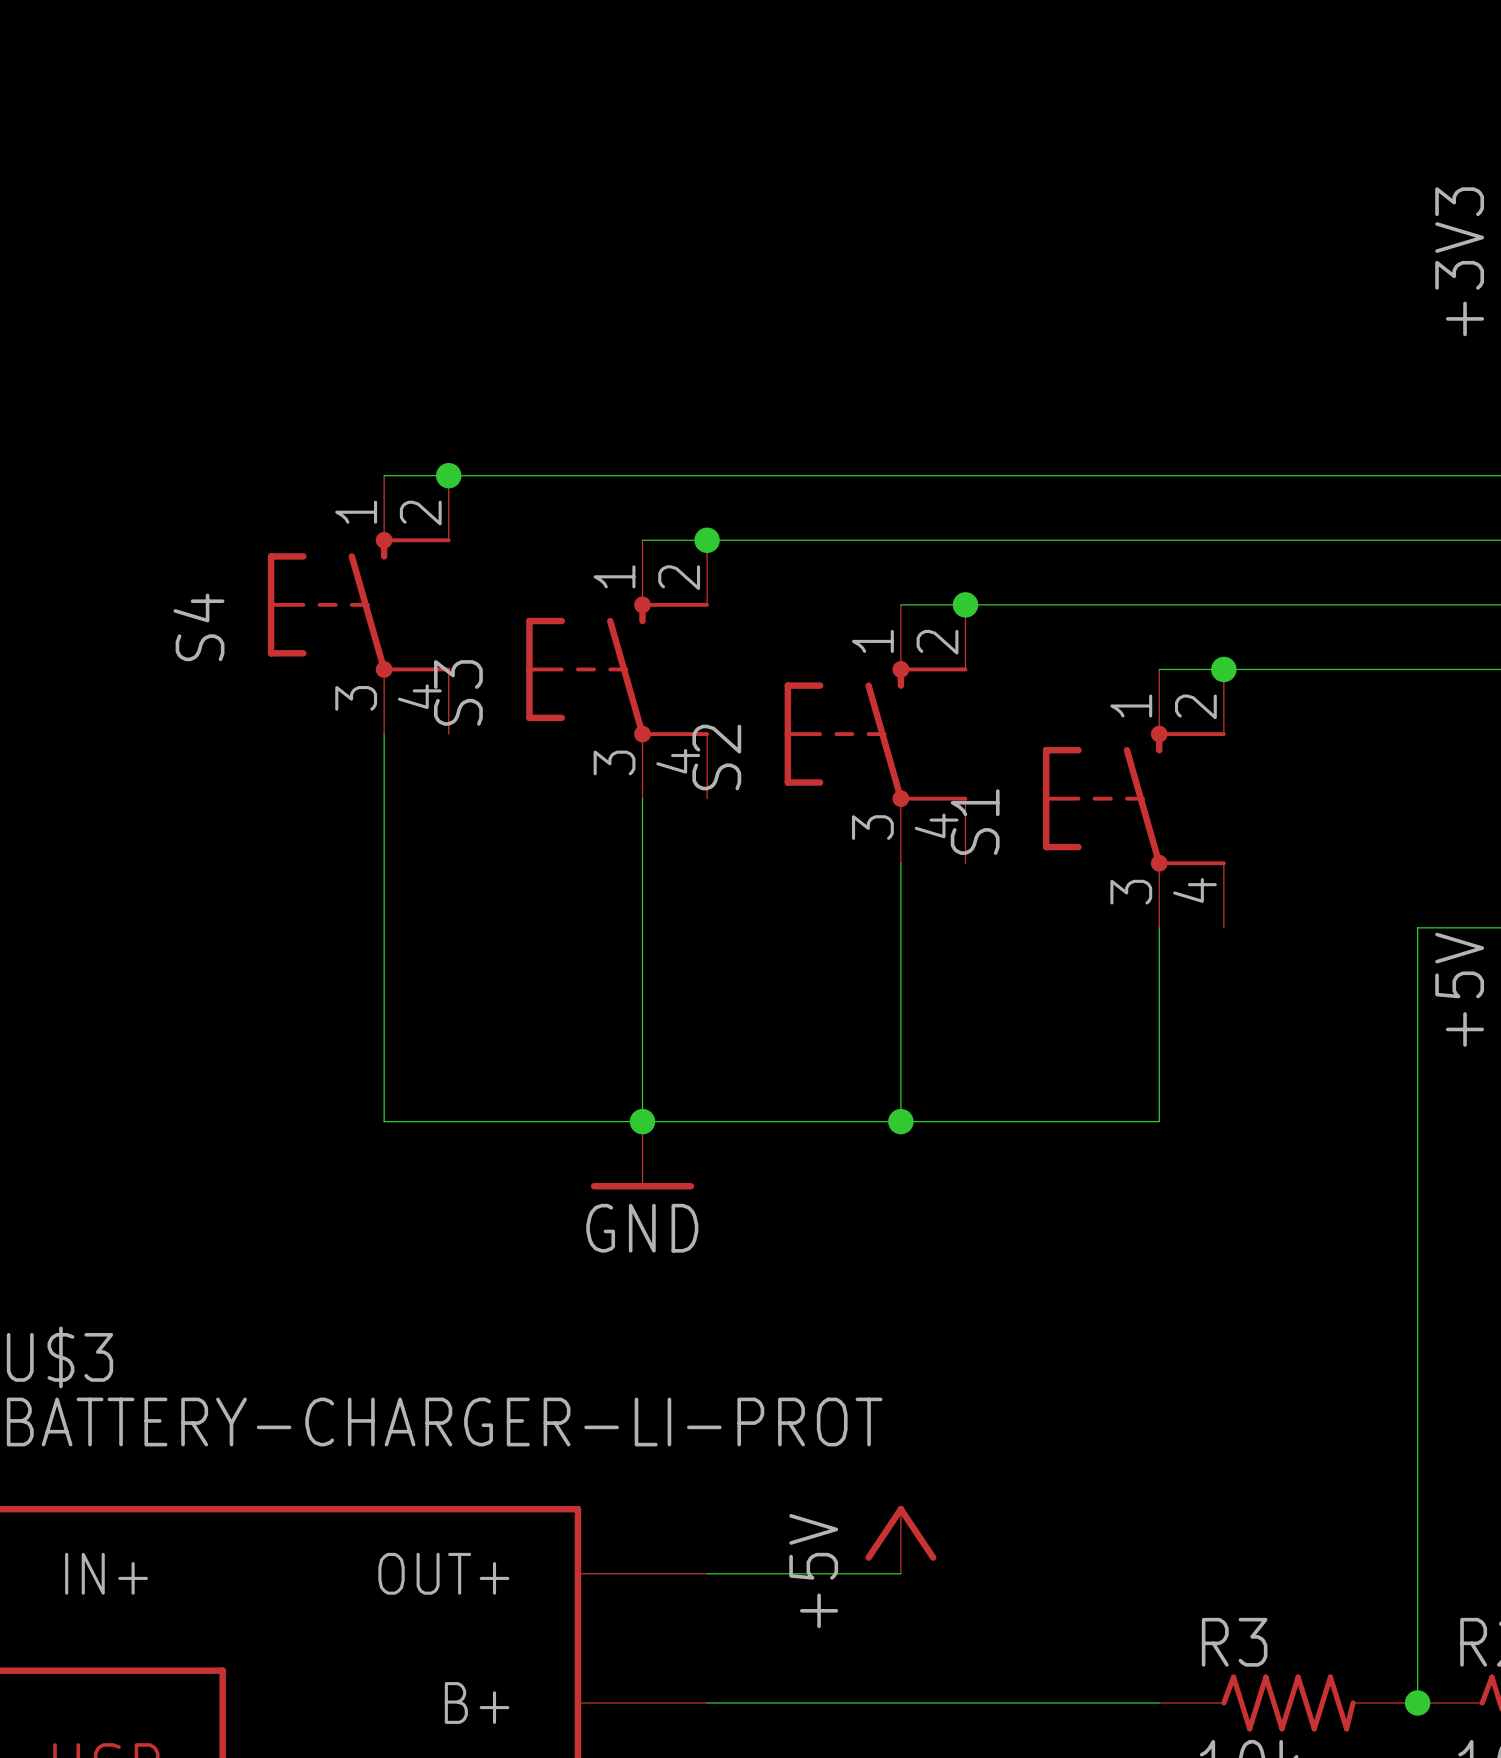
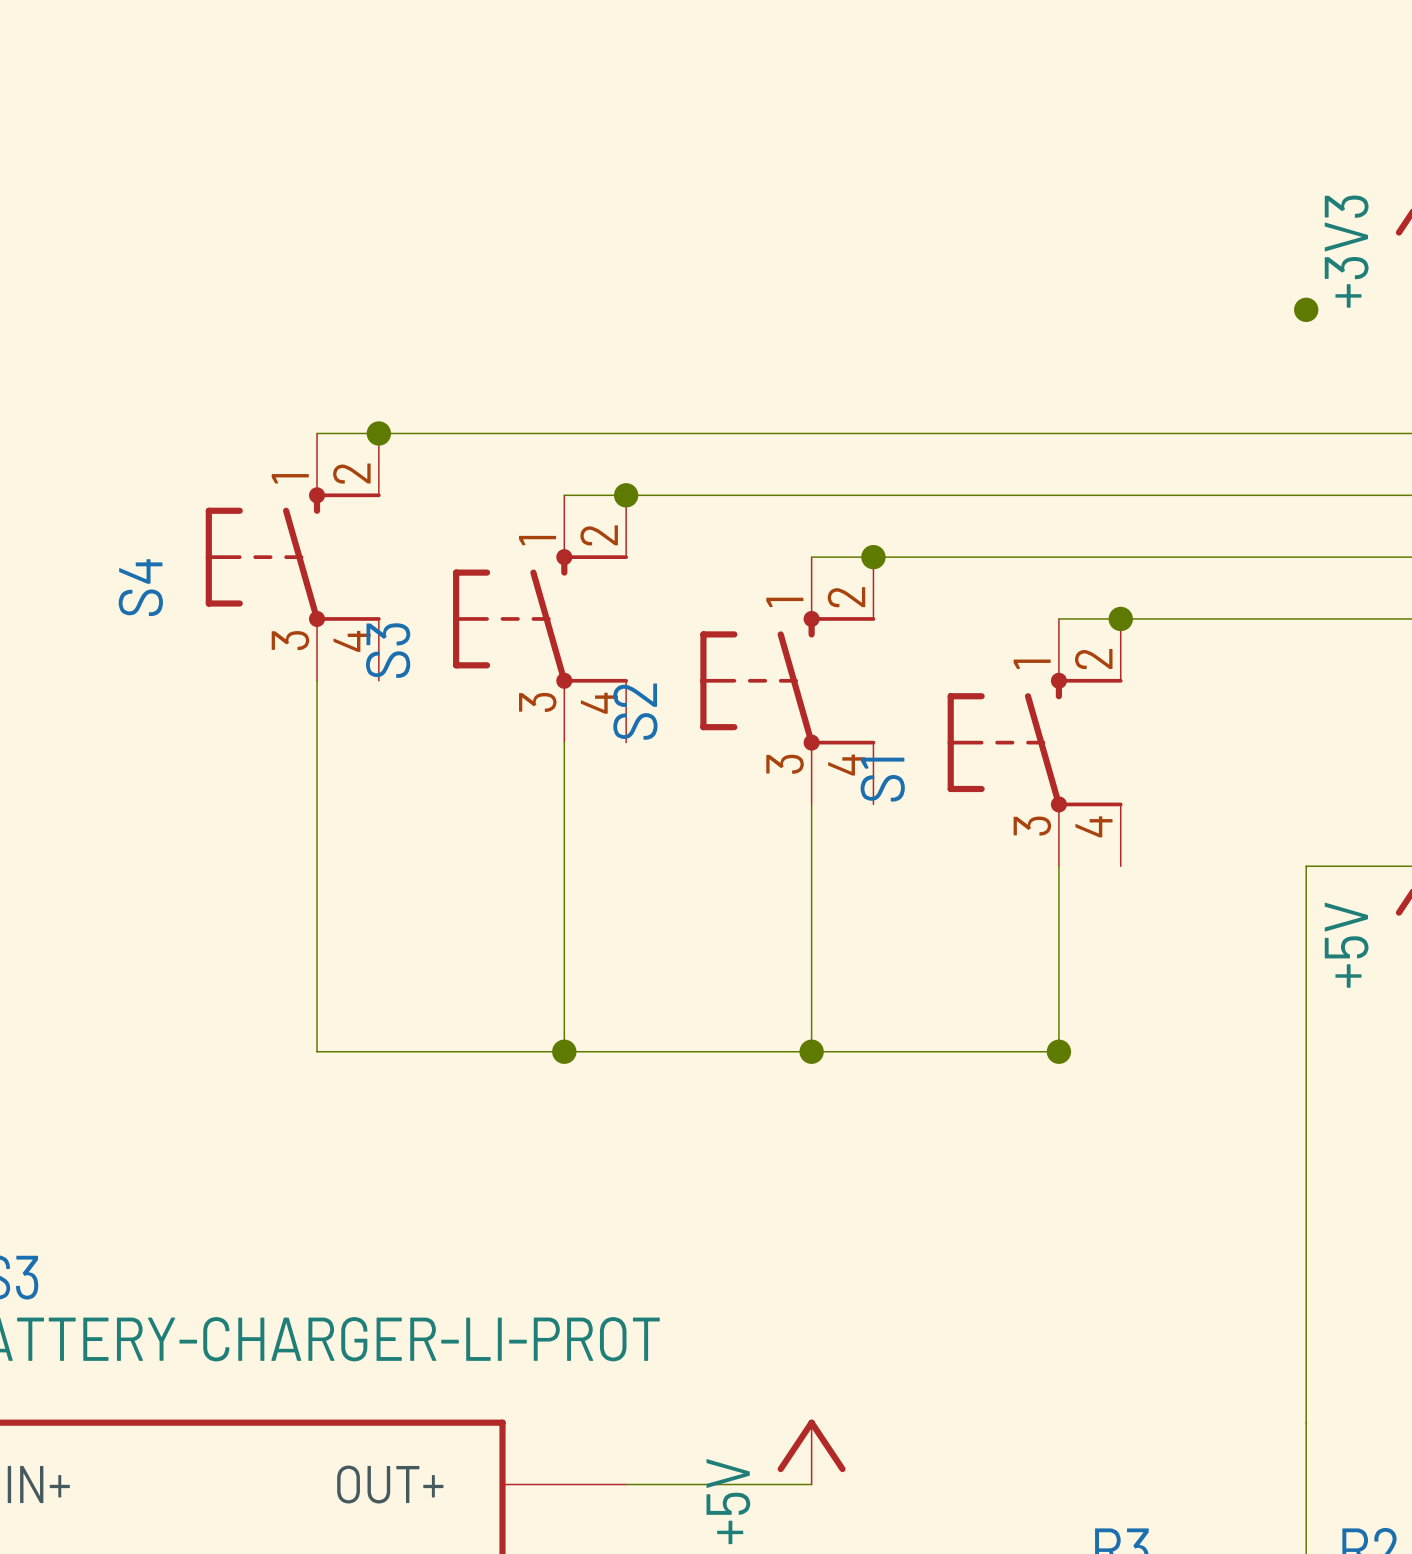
junction: none -> (1306, 309)
junction: none -> (1058, 1051)
power symbol: GND (642, 1155) -> none

